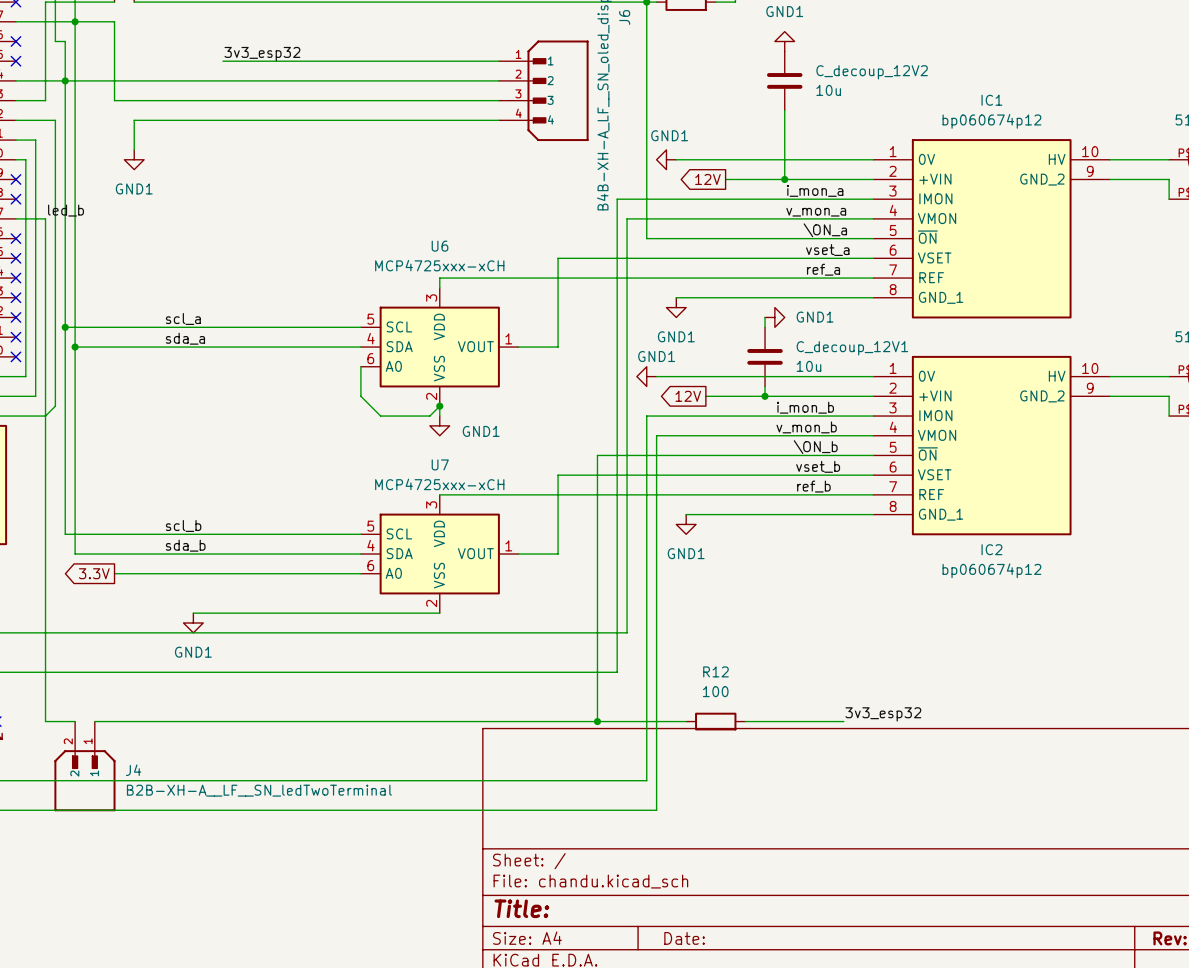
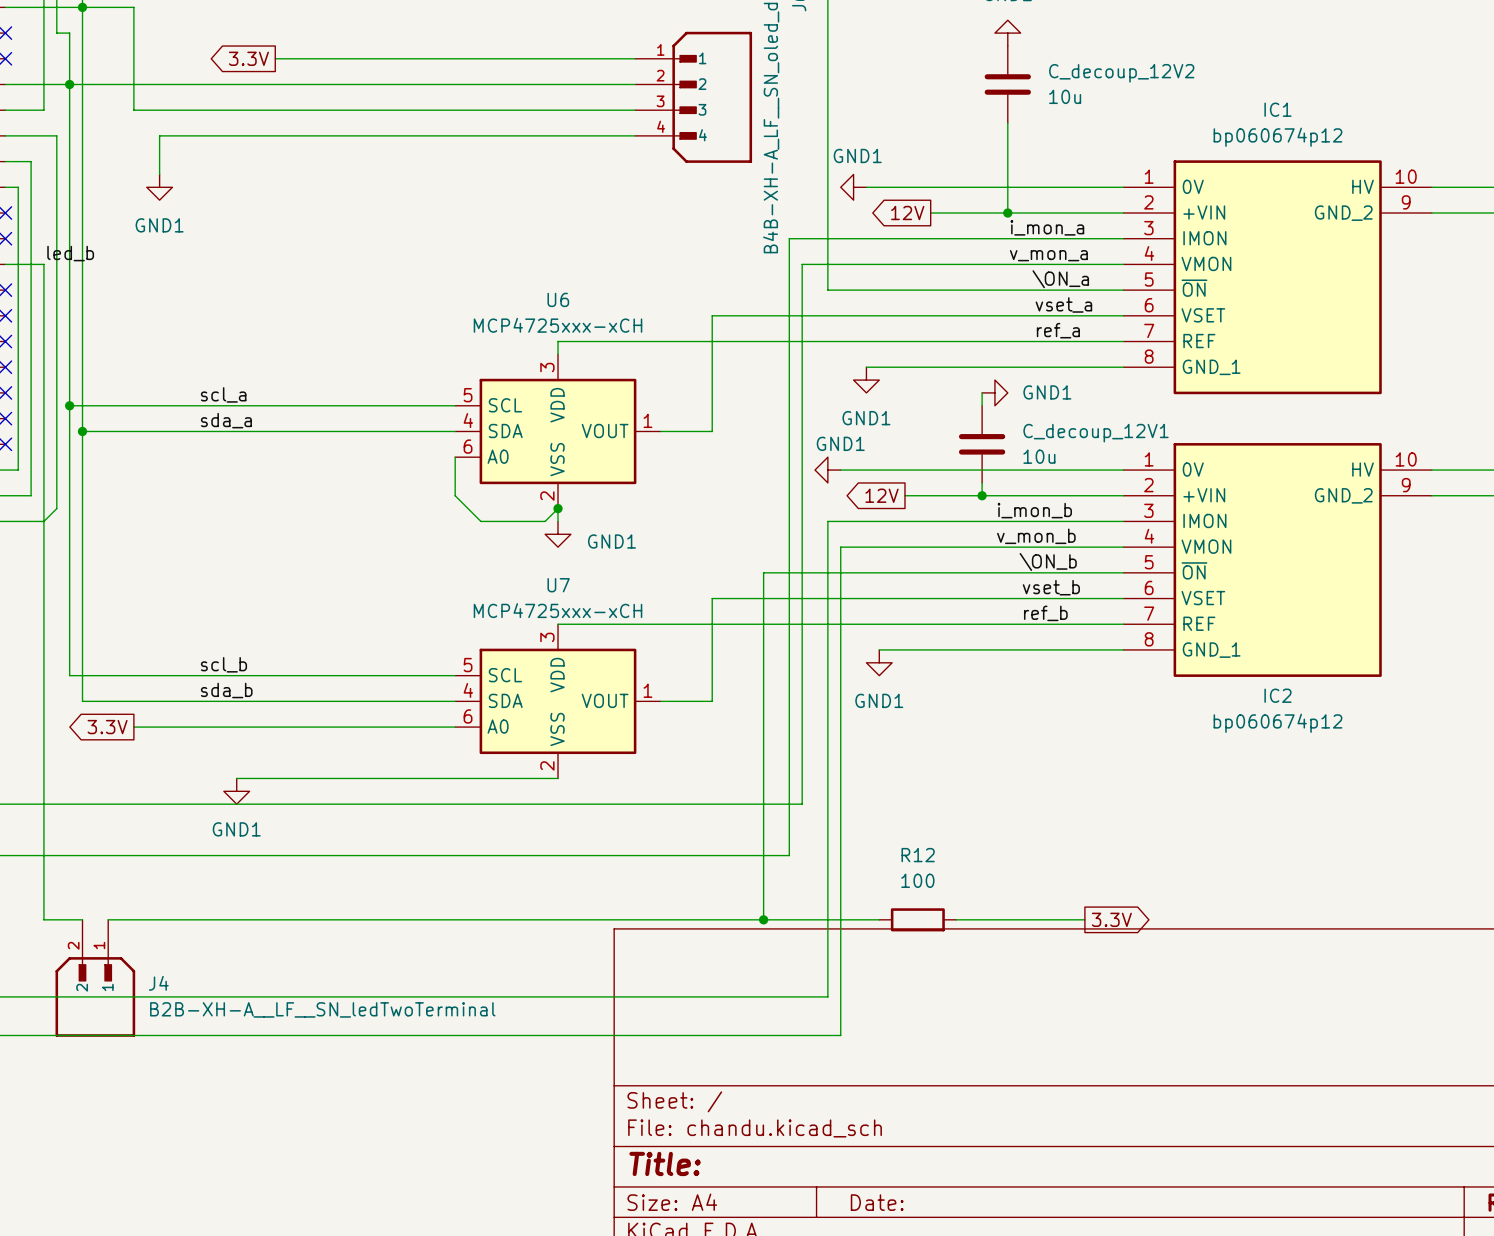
label: 3v3_esp32 (262, 54) -> none
global label: none -> 3.3V (248, 58)
label: 3v3_esp32 (883, 714) -> none
global label: none -> 3.3V (1111, 919)

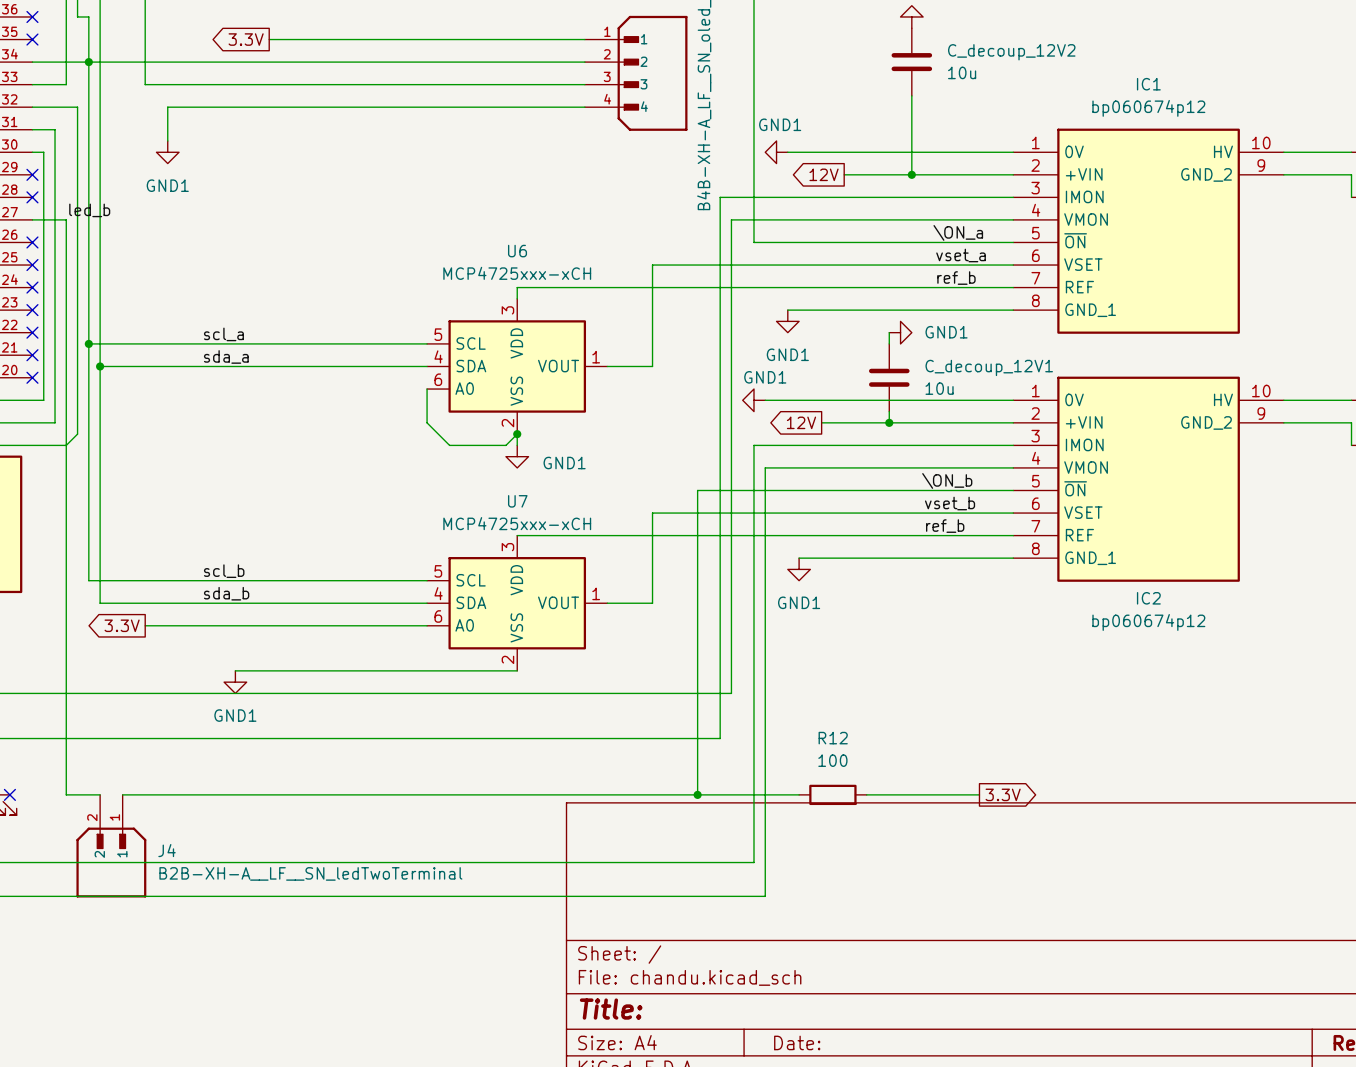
label: i_mon_a (1047, 227) -> none
label: v_mon_a (1048, 255) -> none
label: ref_a (1058, 330) -> ref_b (956, 278)
label: i_mon_b (1034, 510) -> none
label: v_mon_b (1036, 536) -> none

